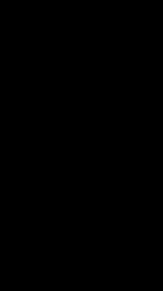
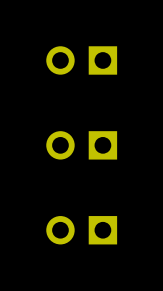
part: none -> (81, 60)
part: none -> (81, 145)
part: none -> (81, 230)

